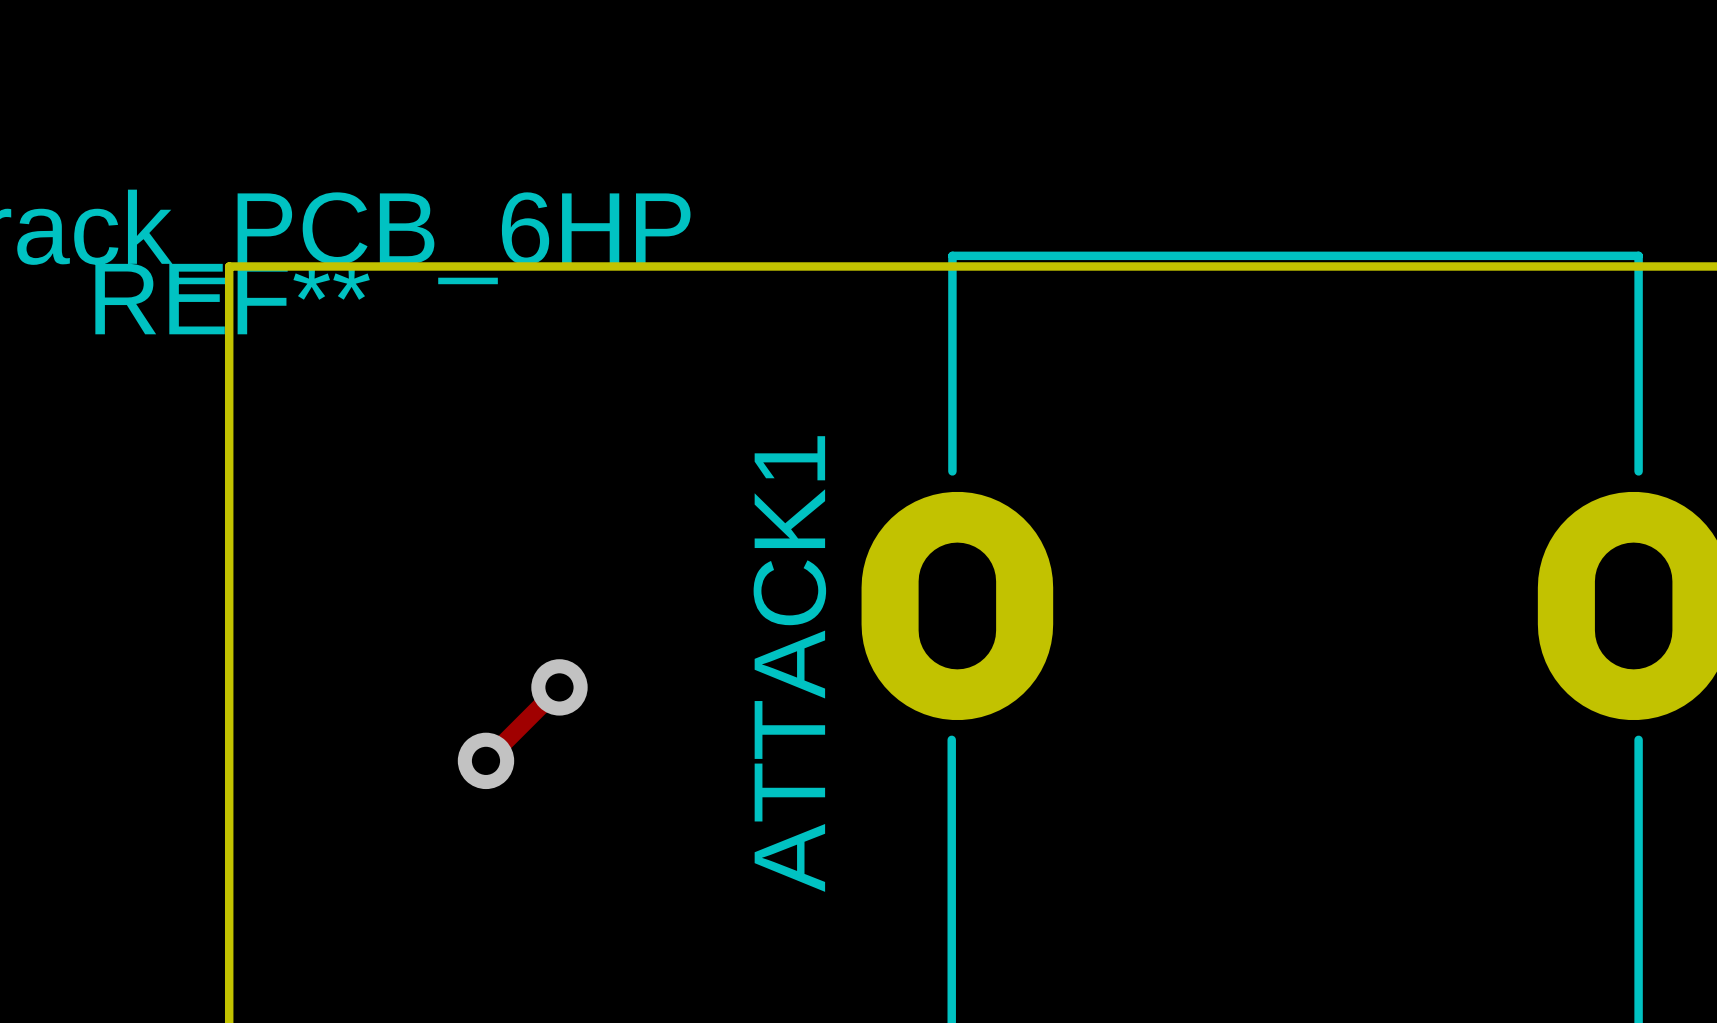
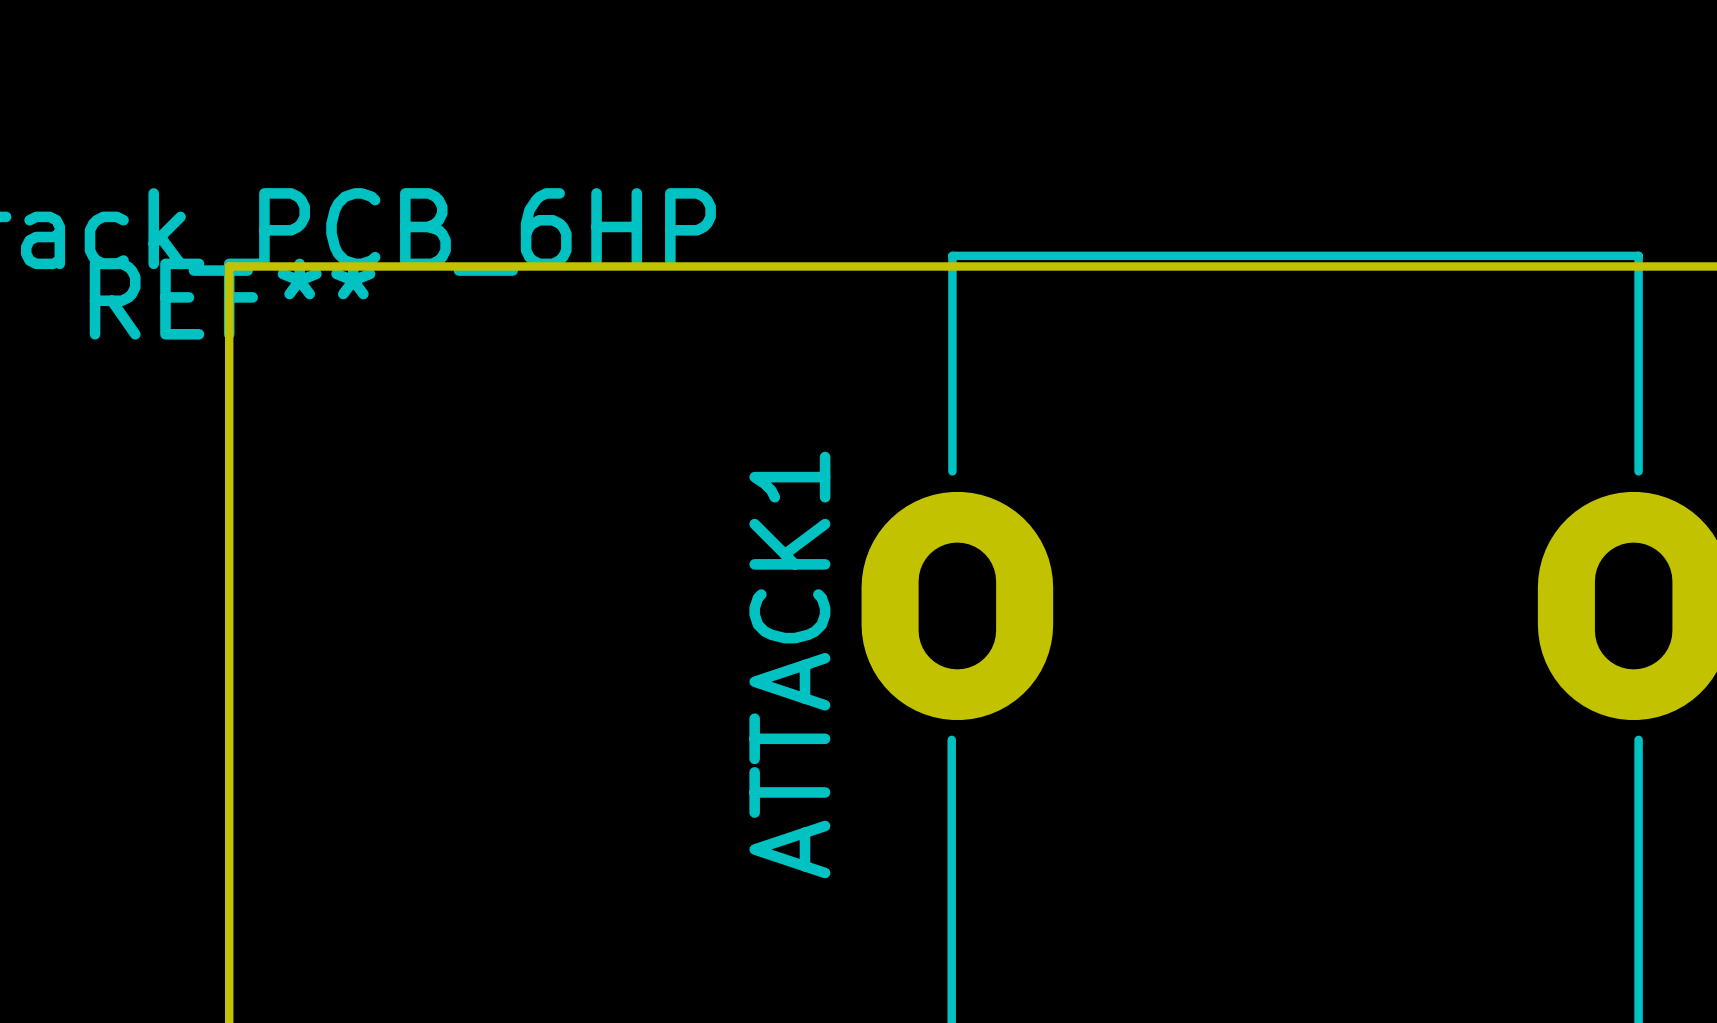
track: (559, 687) (485, 760) -> none
via: (559, 687) -> none
via: (485, 760) -> none

